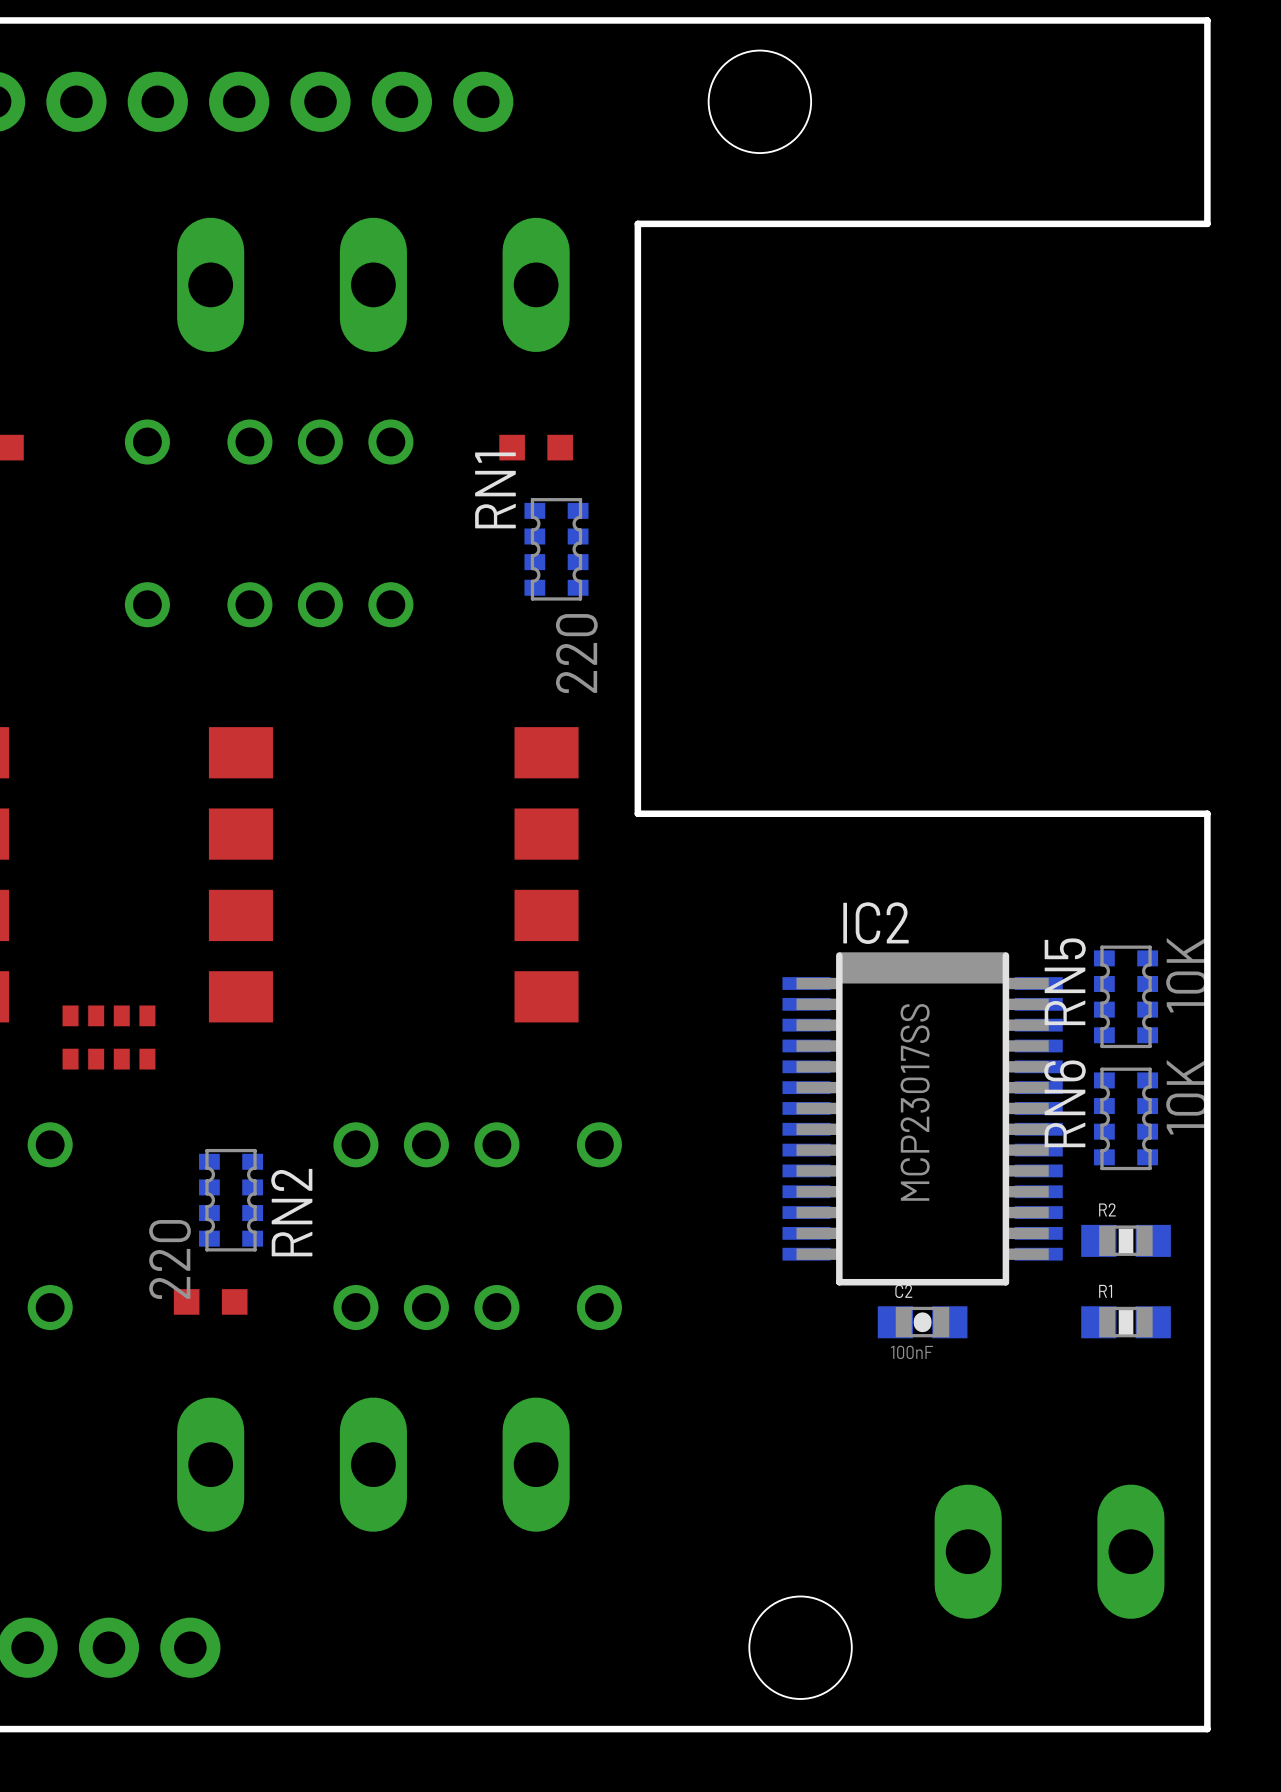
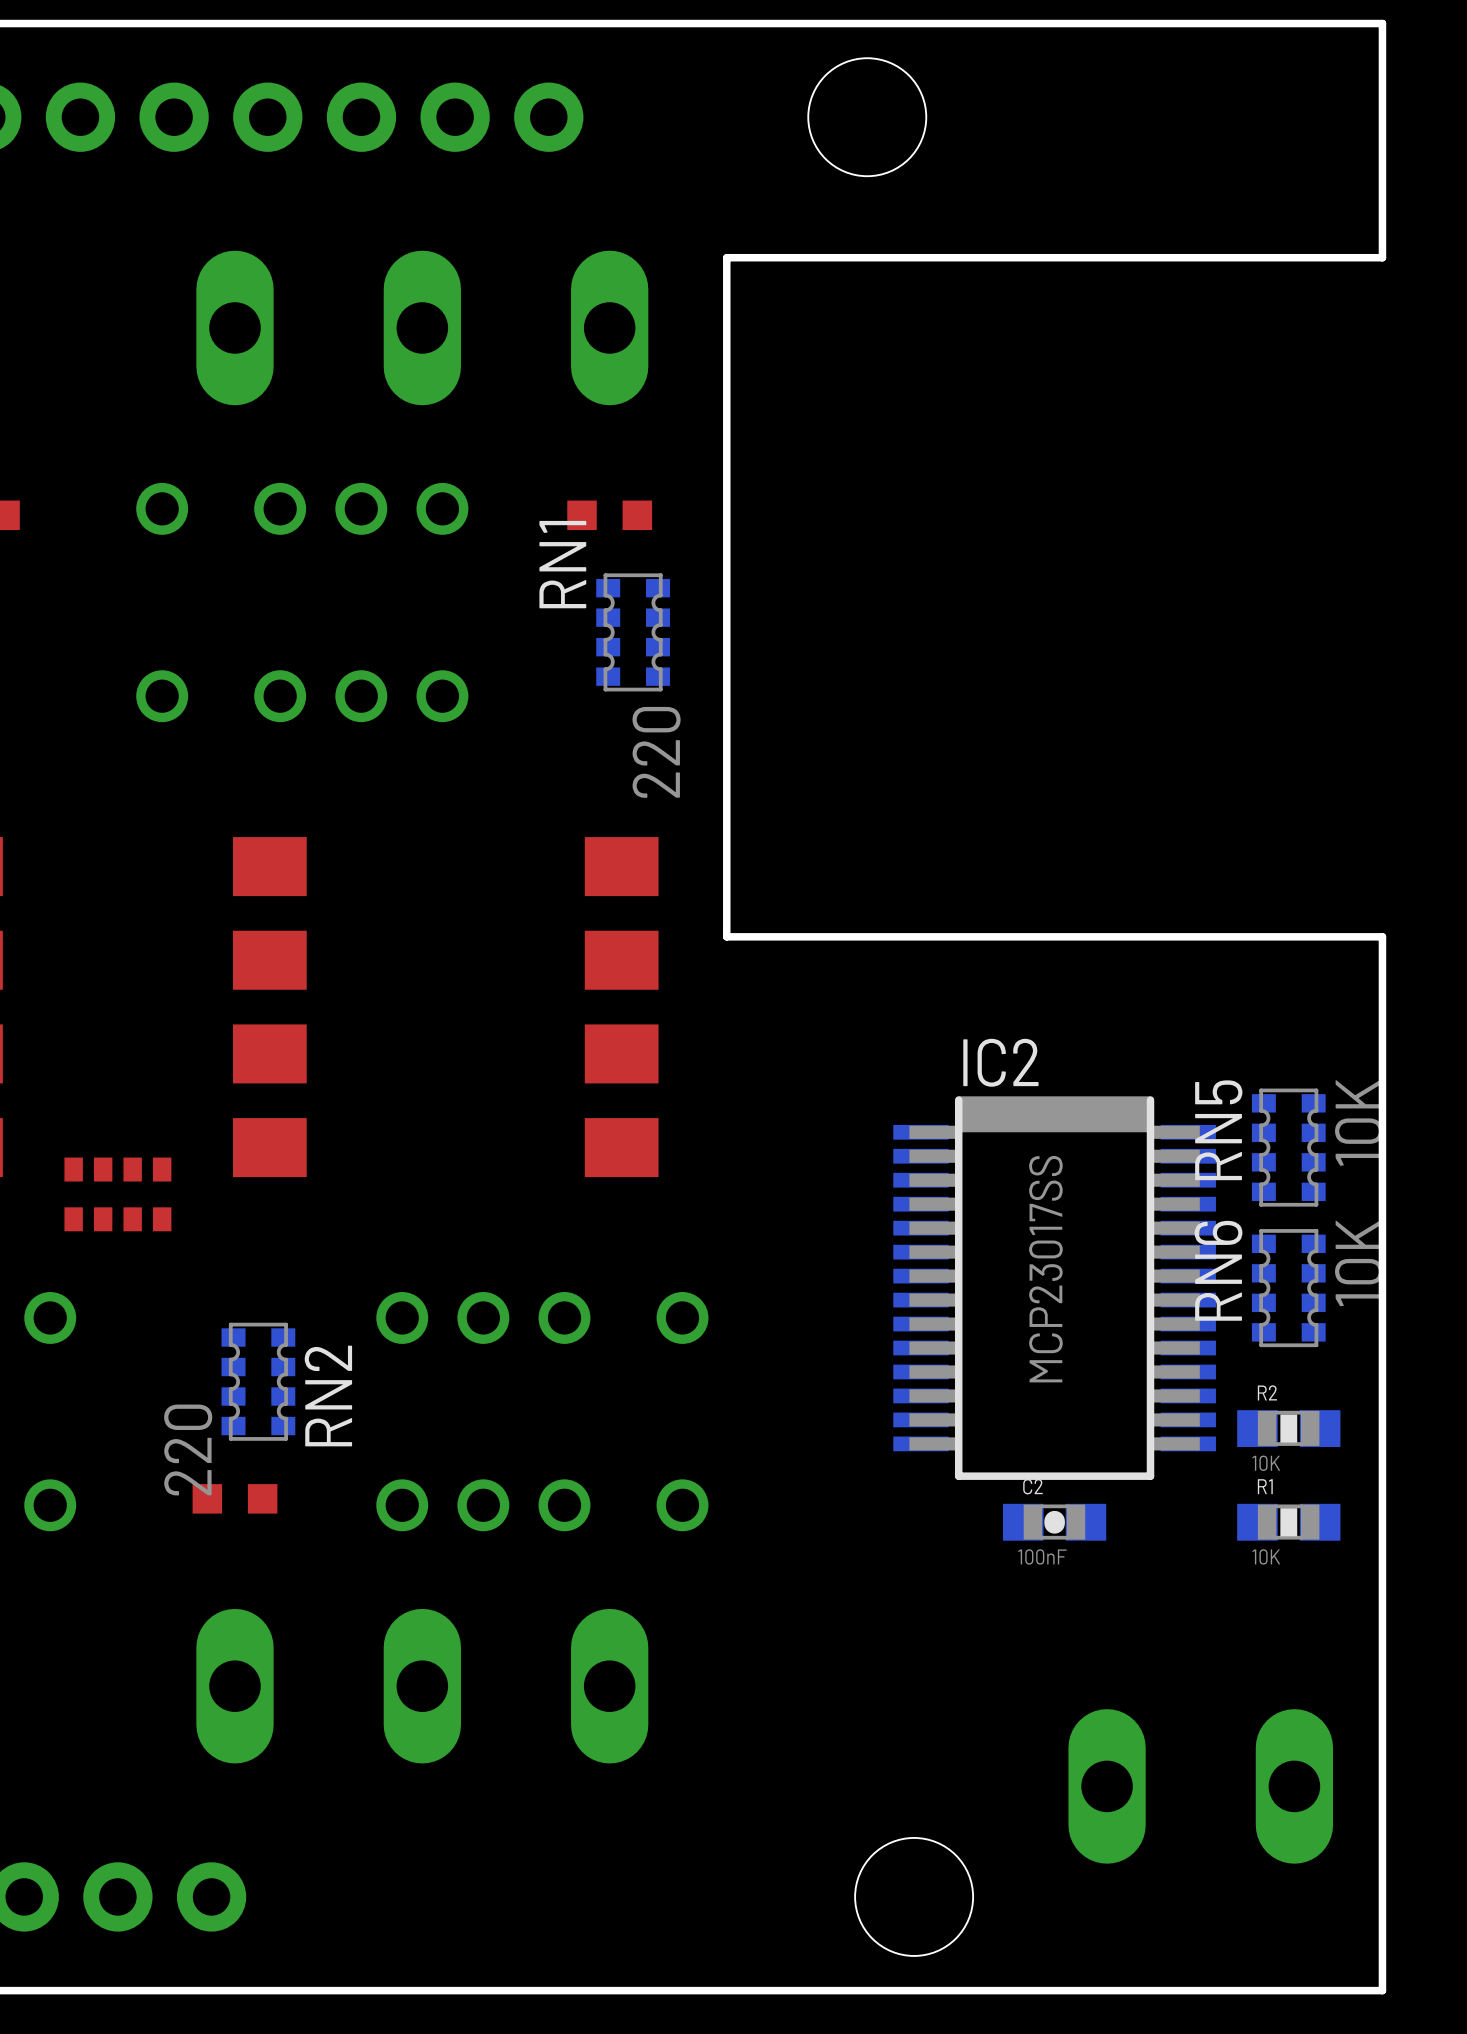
R2 value: none -> 10K (1266, 1463)
R1 value: none -> 10K (1266, 1556)

